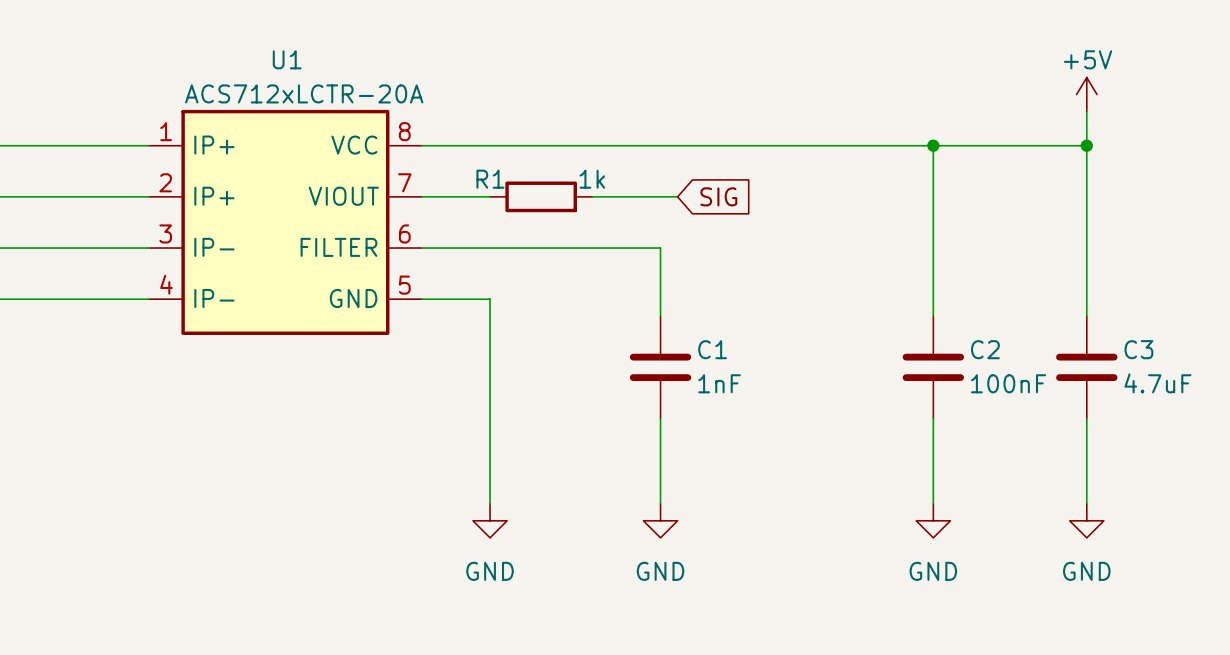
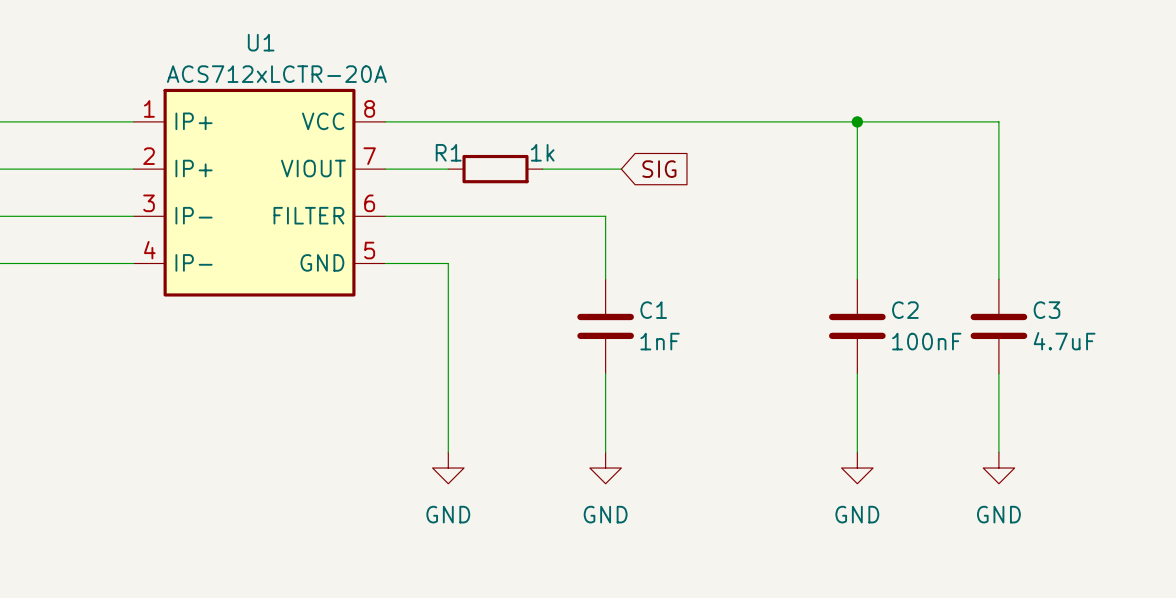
power symbol: +5V (1086, 94) -> none
wire: (1086, 111) (1086, 145) -> none
junction: (1086, 145) -> none

